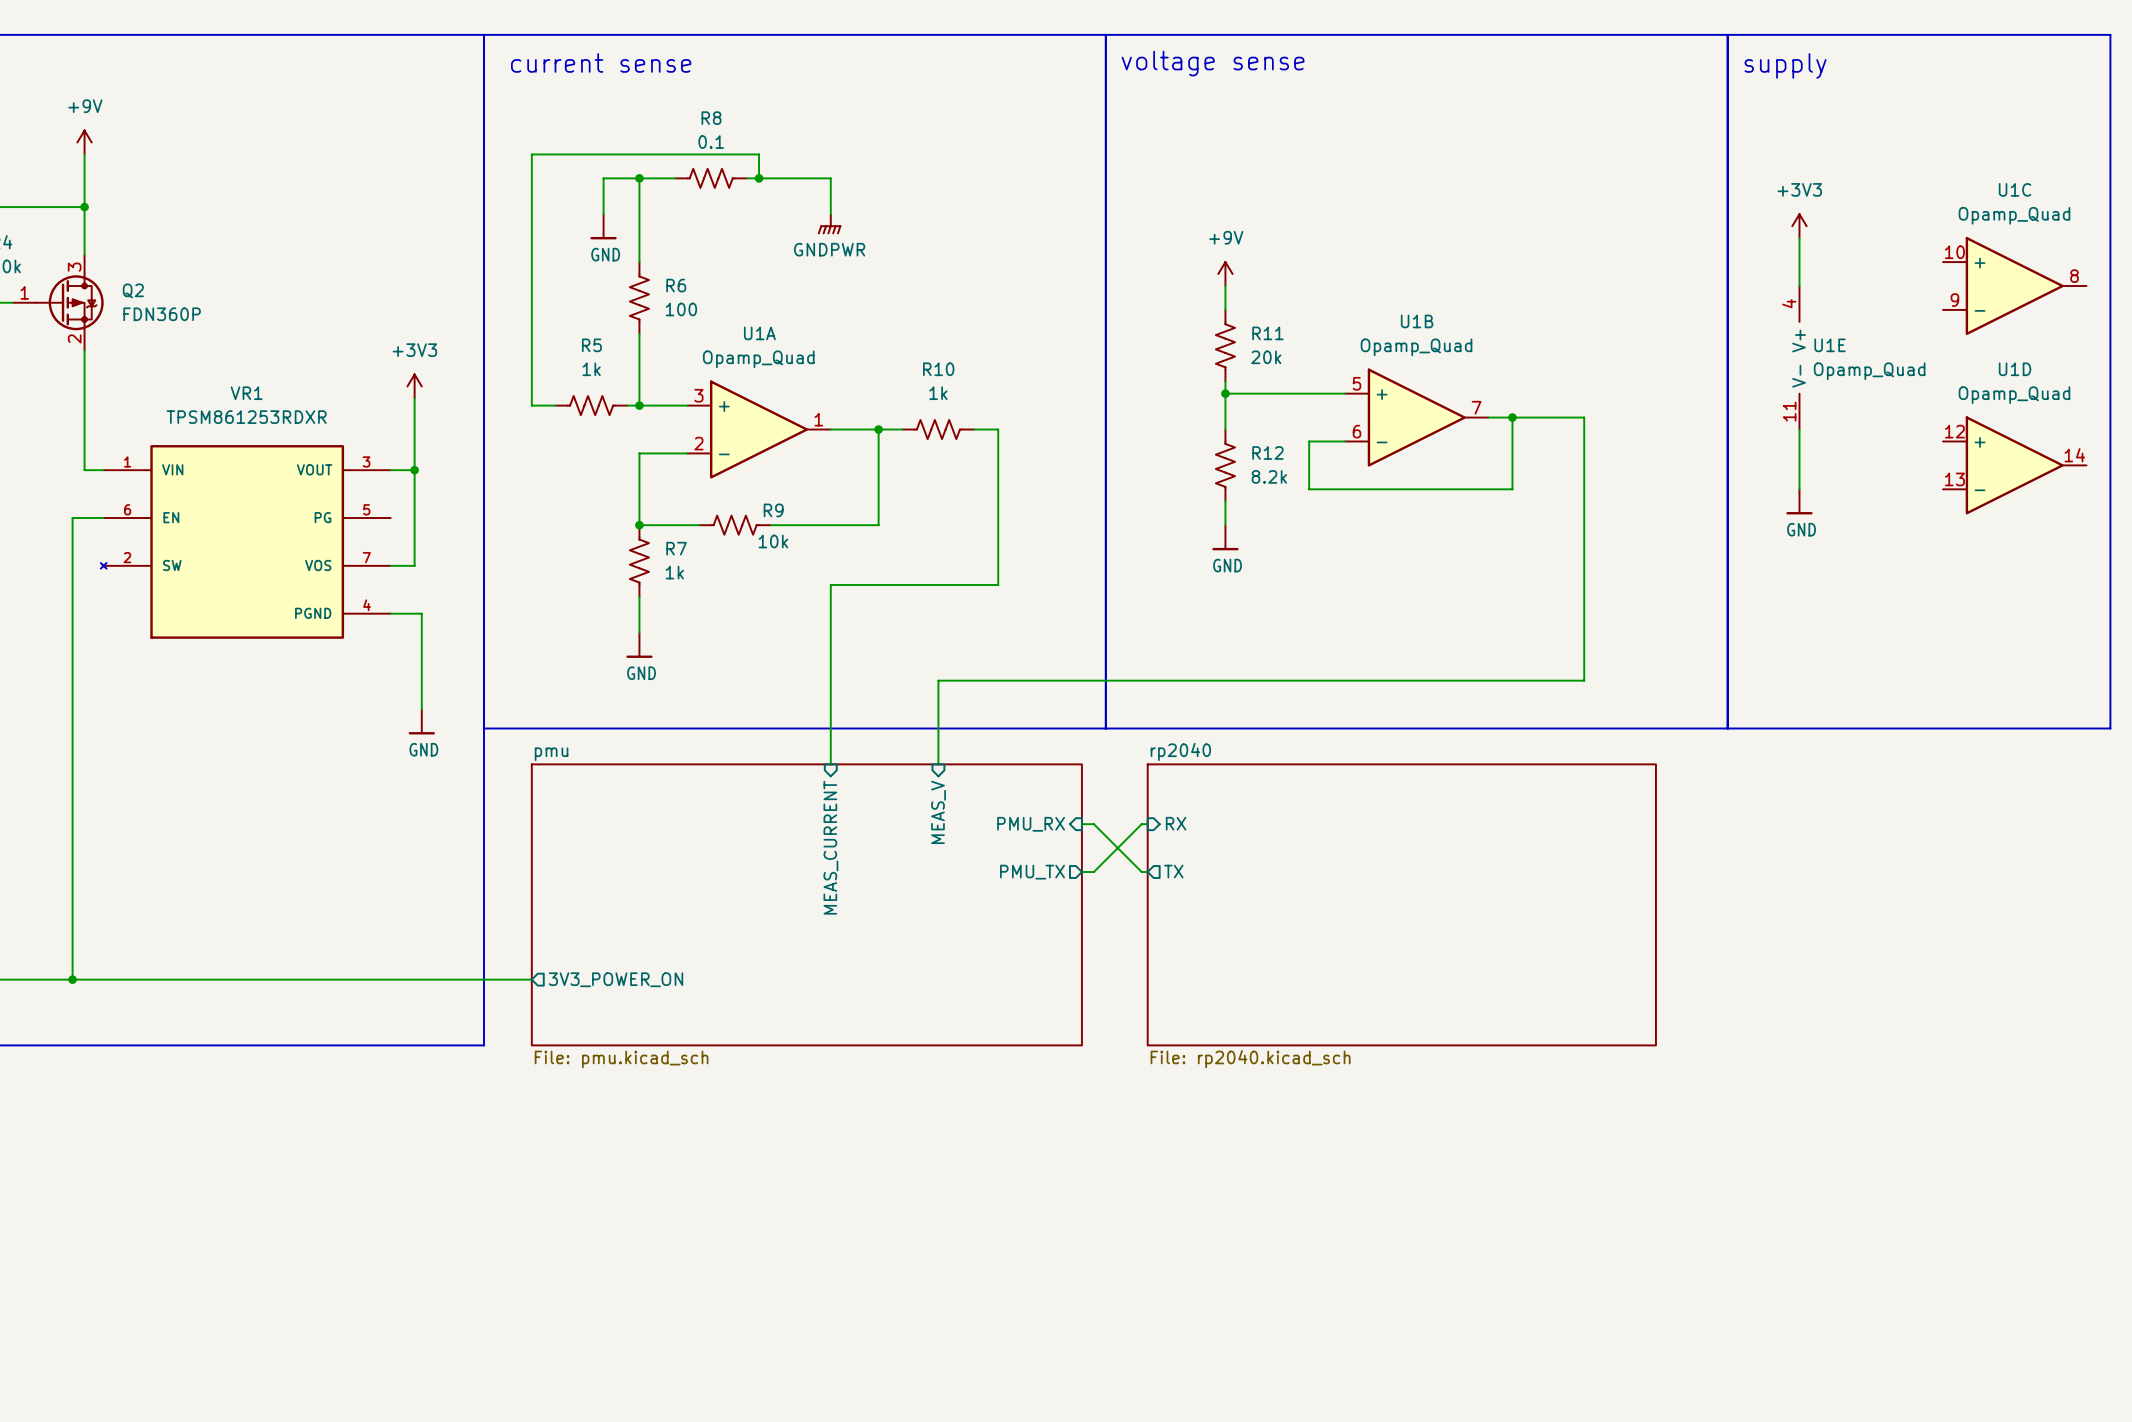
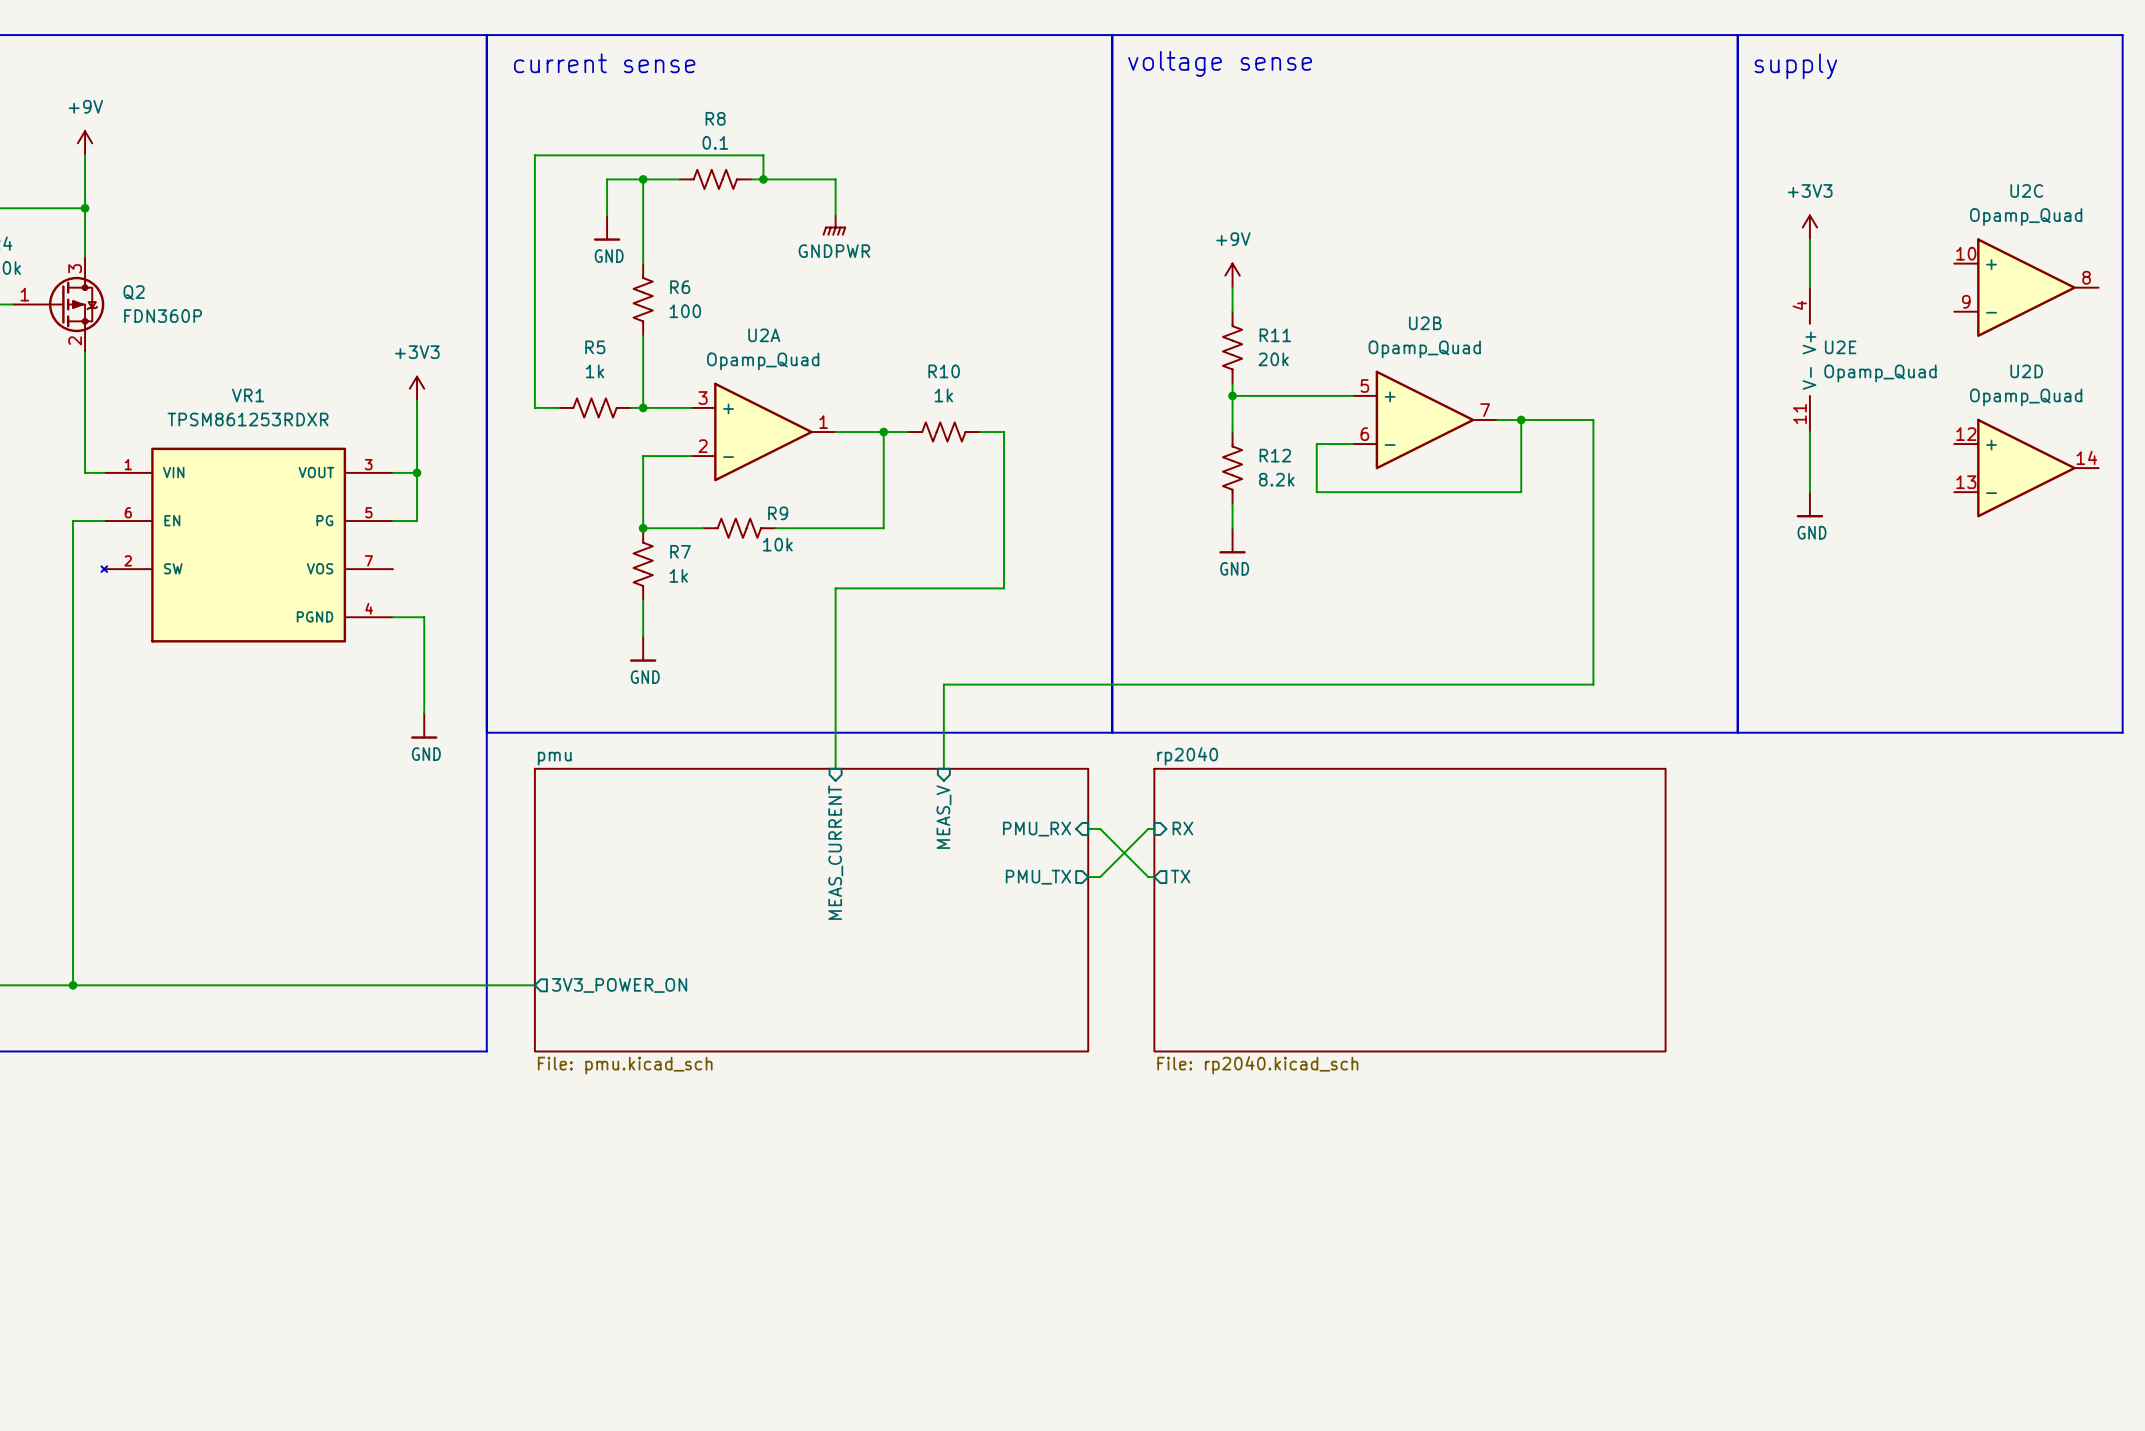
U1C name: U1C (2015, 189) -> U2C (2026, 190)
U1B name: U1B (1417, 321) -> U2B (1425, 323)
U1A name: U1A (759, 333) -> U2A (764, 335)
U1E name: U1E (1830, 345) -> U2E (1840, 347)
U1D name: U1D (2015, 369) -> U2D (2026, 371)
wire: (414, 518) (414, 565) (390, 565) -> (417, 521) (392, 521)

